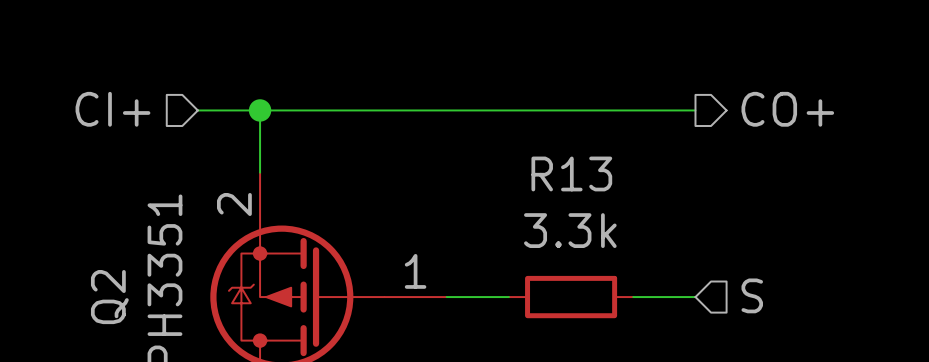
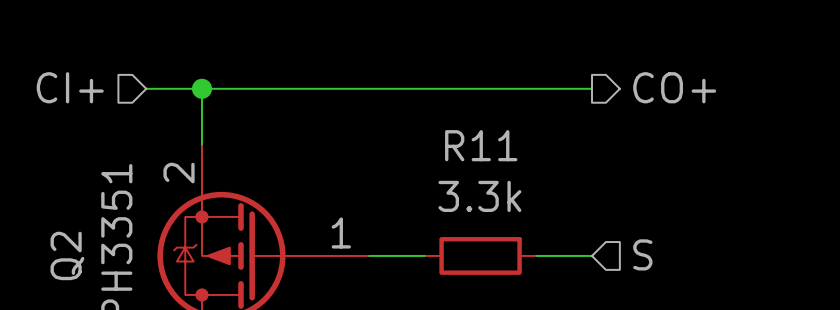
R13 name: R13 (571, 173) -> R11 (481, 145)

